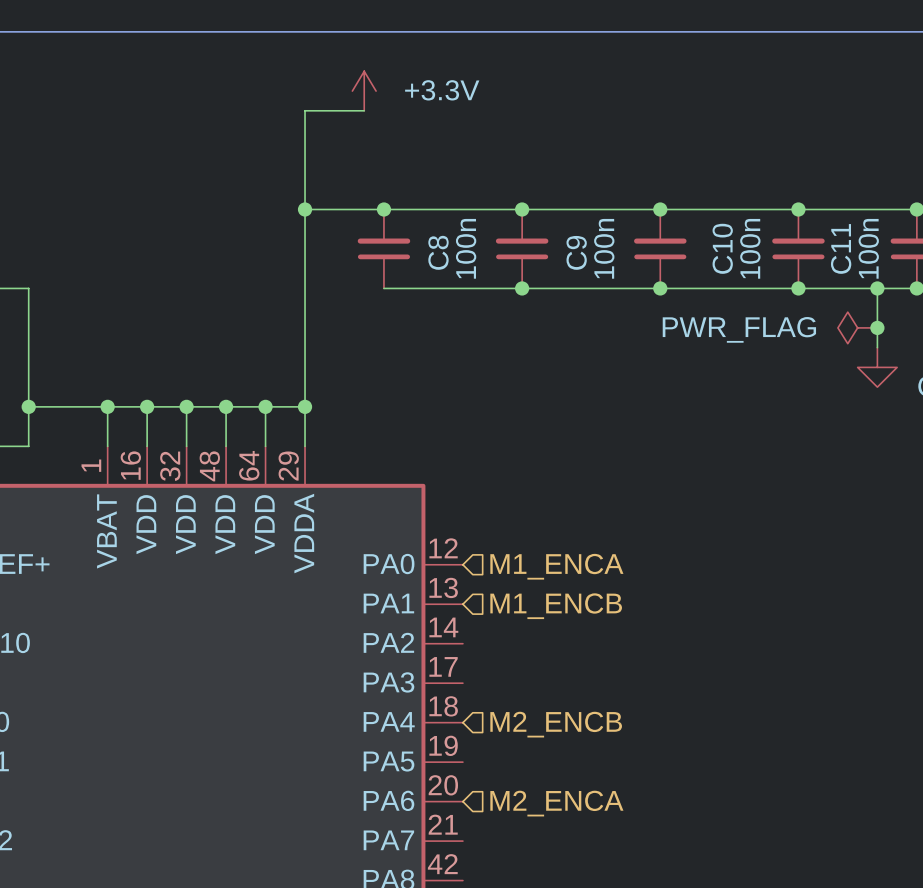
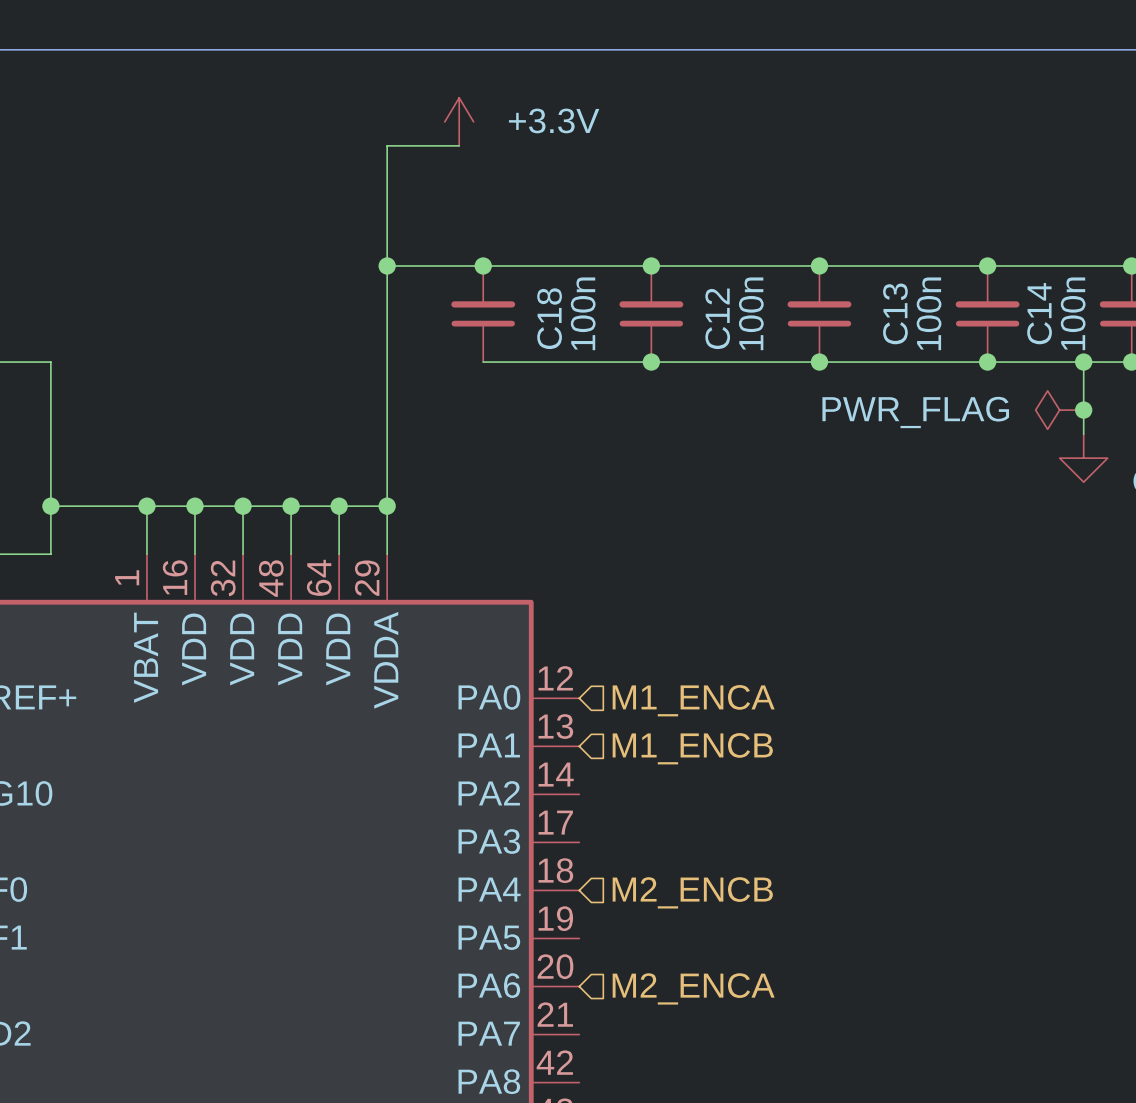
C10 name: C10 (722, 248) -> C13 (895, 313)
C11 name: C11 (841, 248) -> C14 (1039, 313)
C8 name: C8 (438, 252) -> C18 (549, 318)
C9 name: C9 (576, 252) -> C12 (717, 318)

